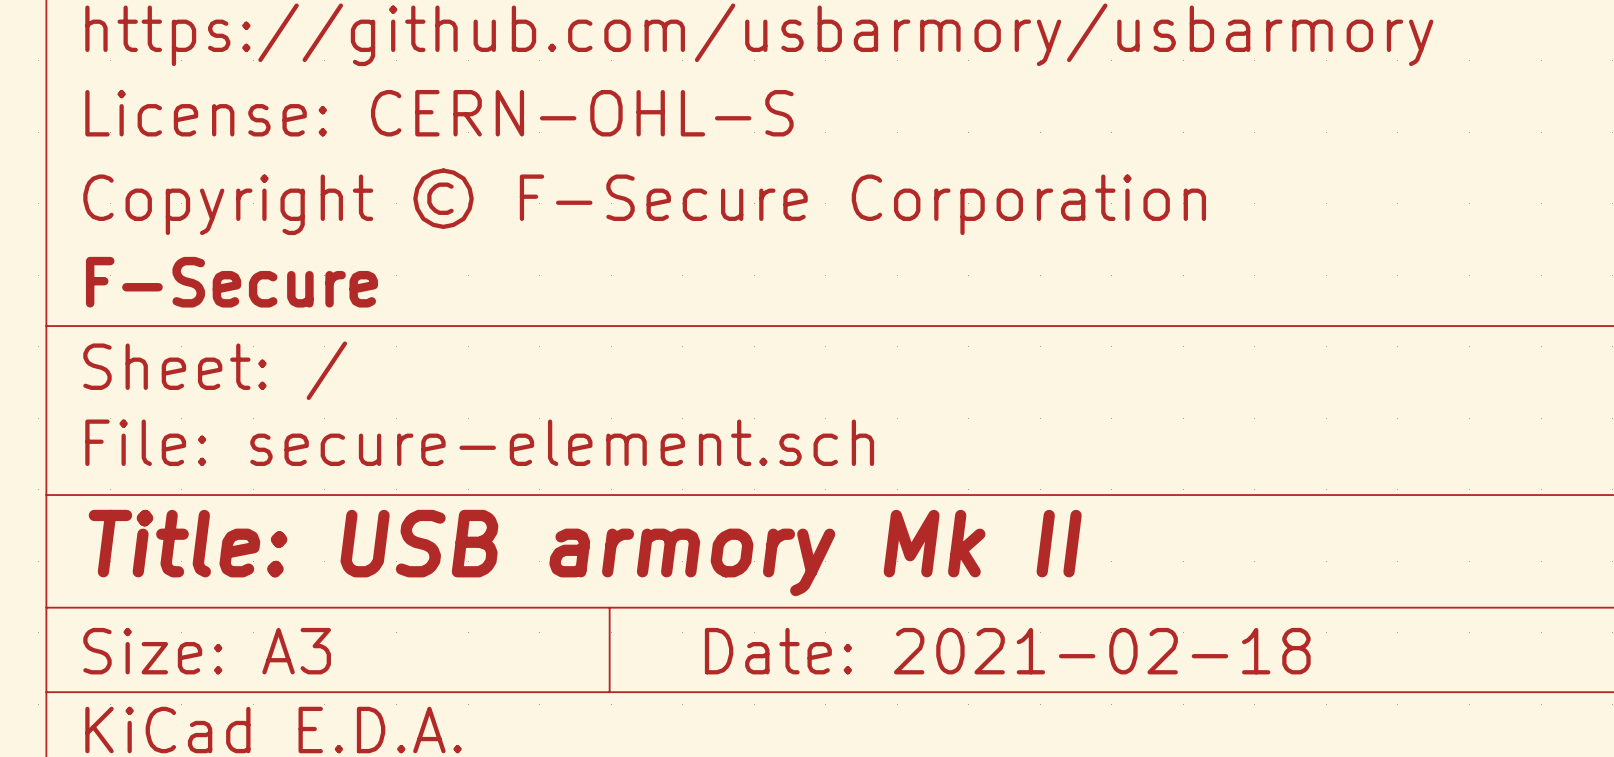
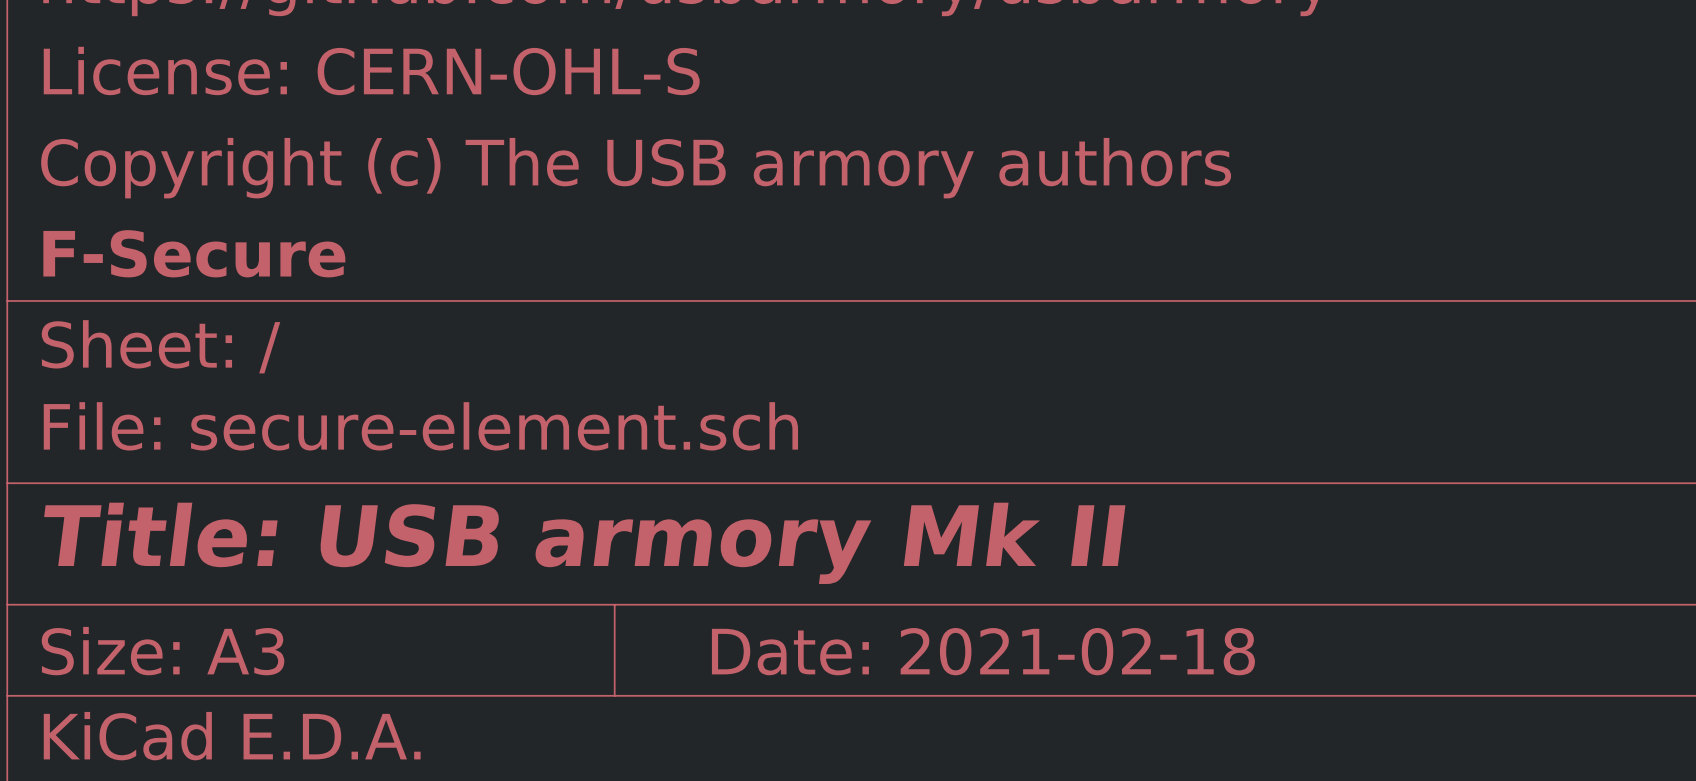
title block: Copyright © F-Secure Corporation (644, 201) -> Copyright (c) The USB armory authors (636, 168)

